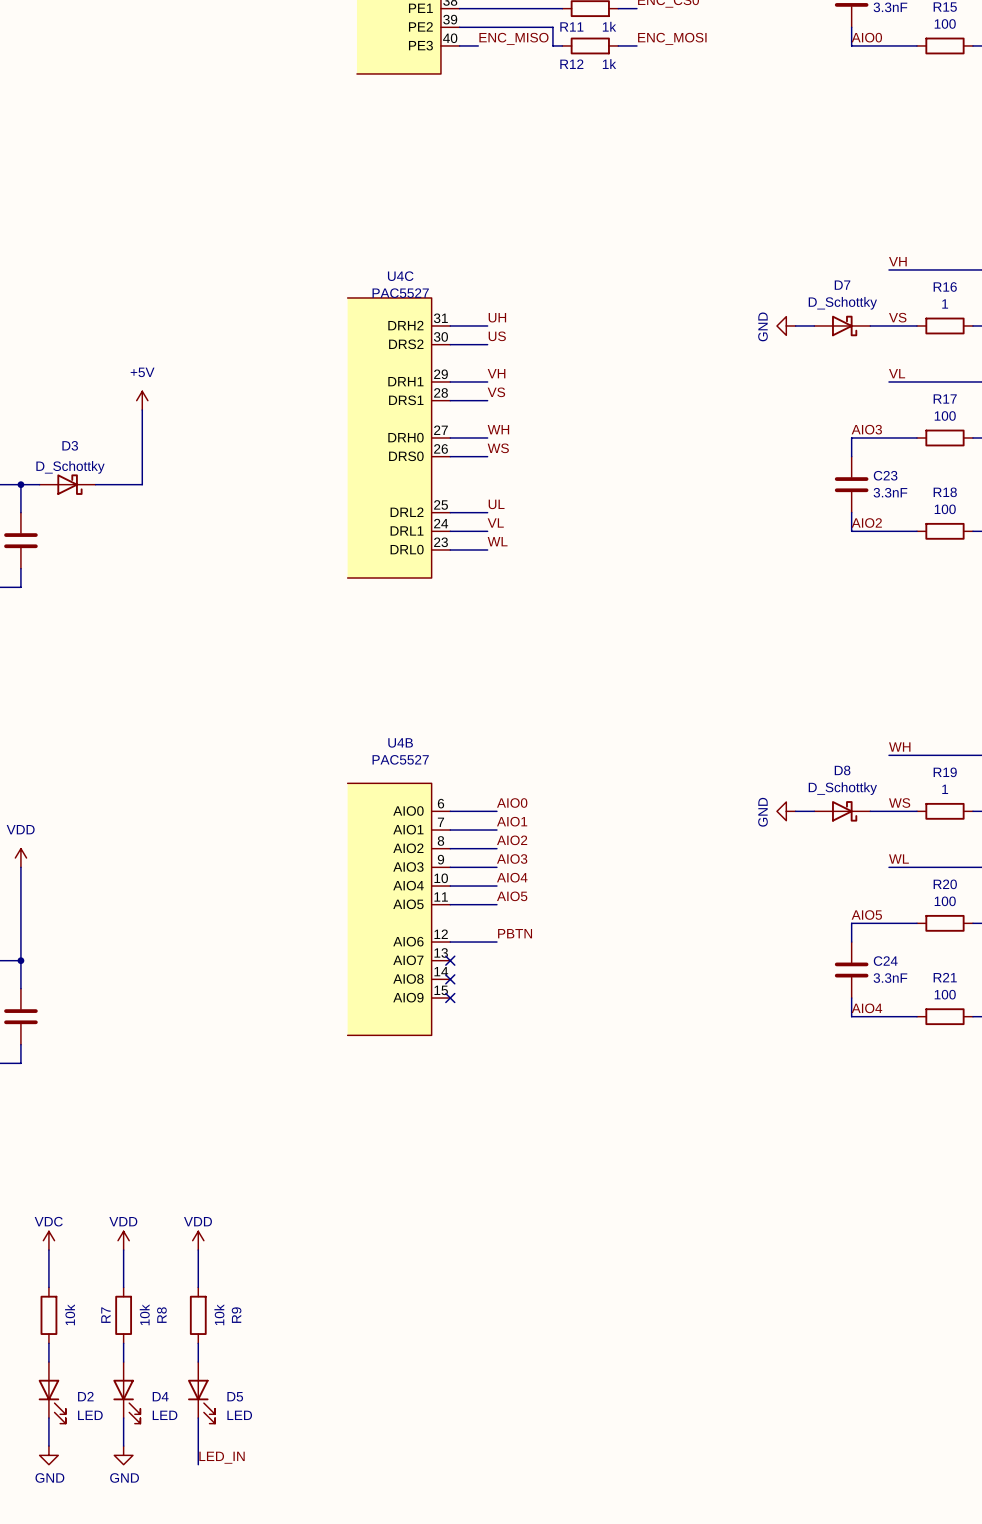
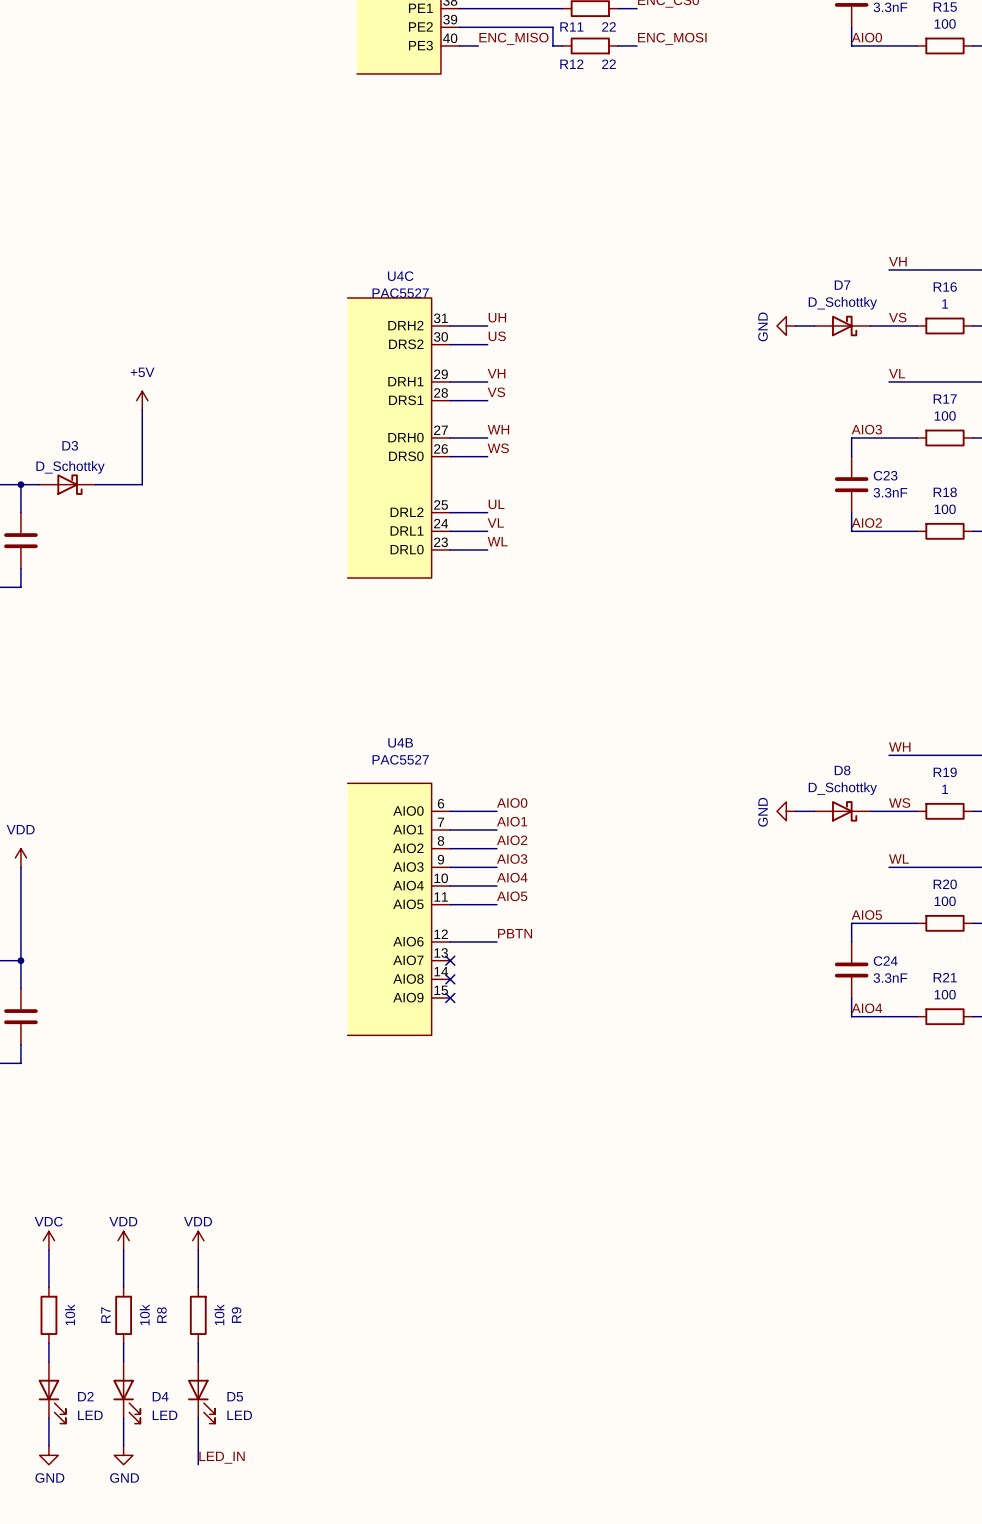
R11 value: 1k (609, 26) -> 22 (608, 26)
R12 value: 1k (609, 64) -> 22 (608, 64)

